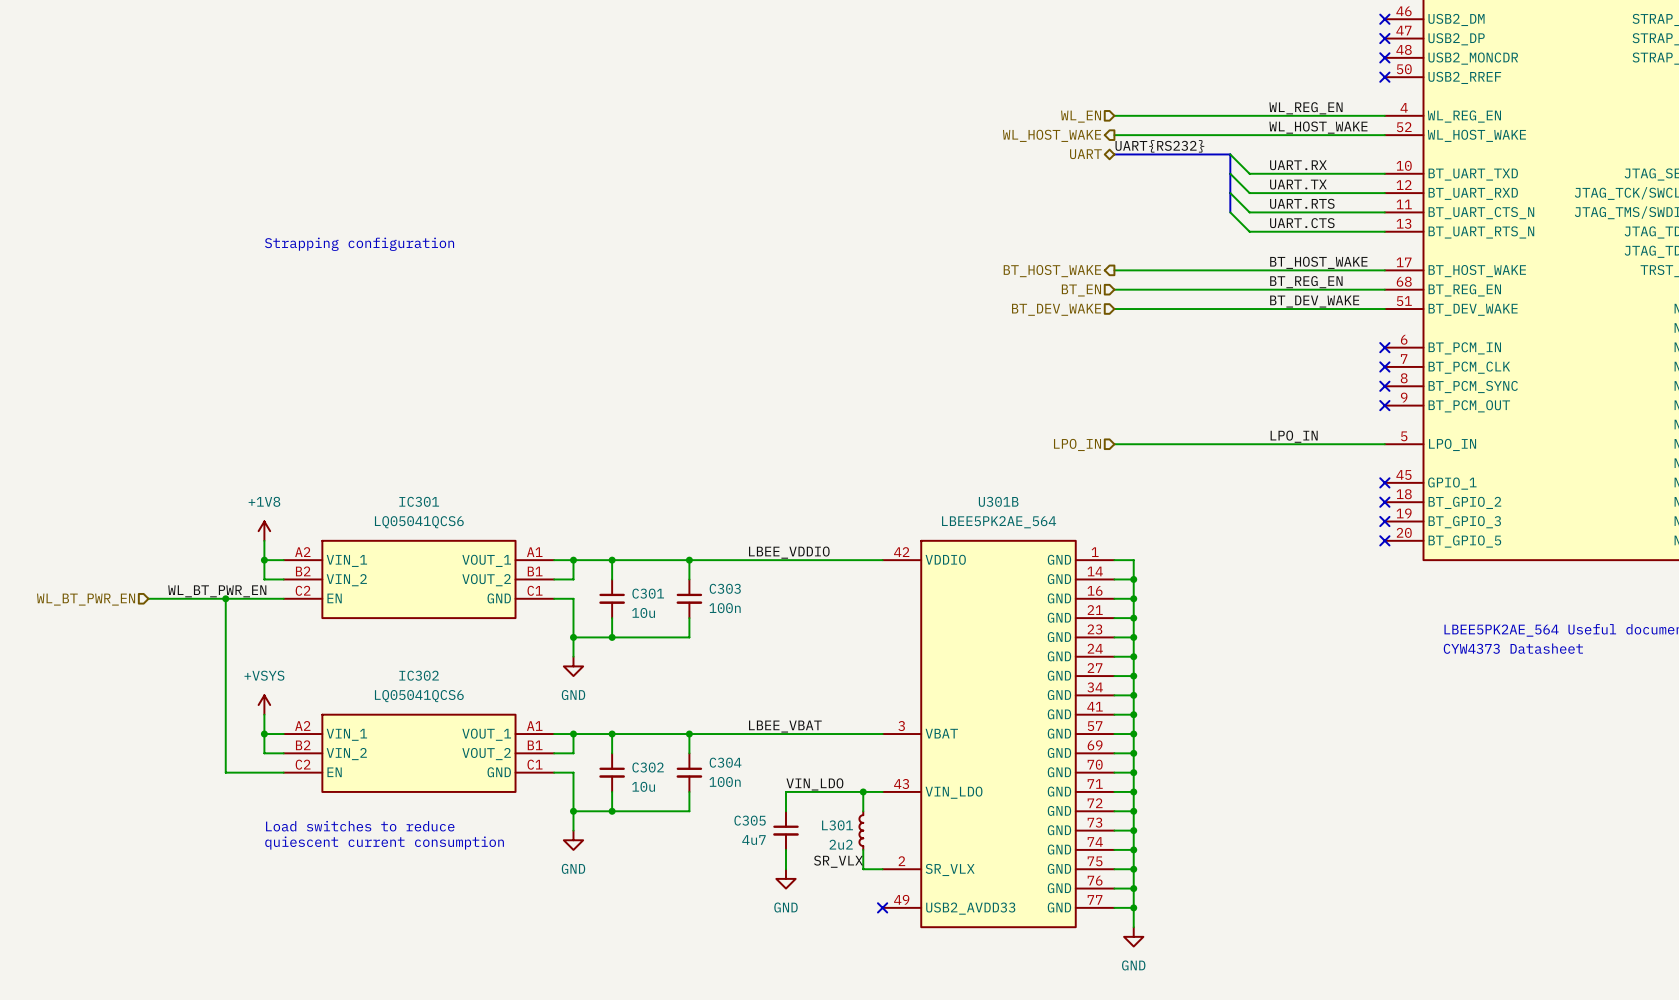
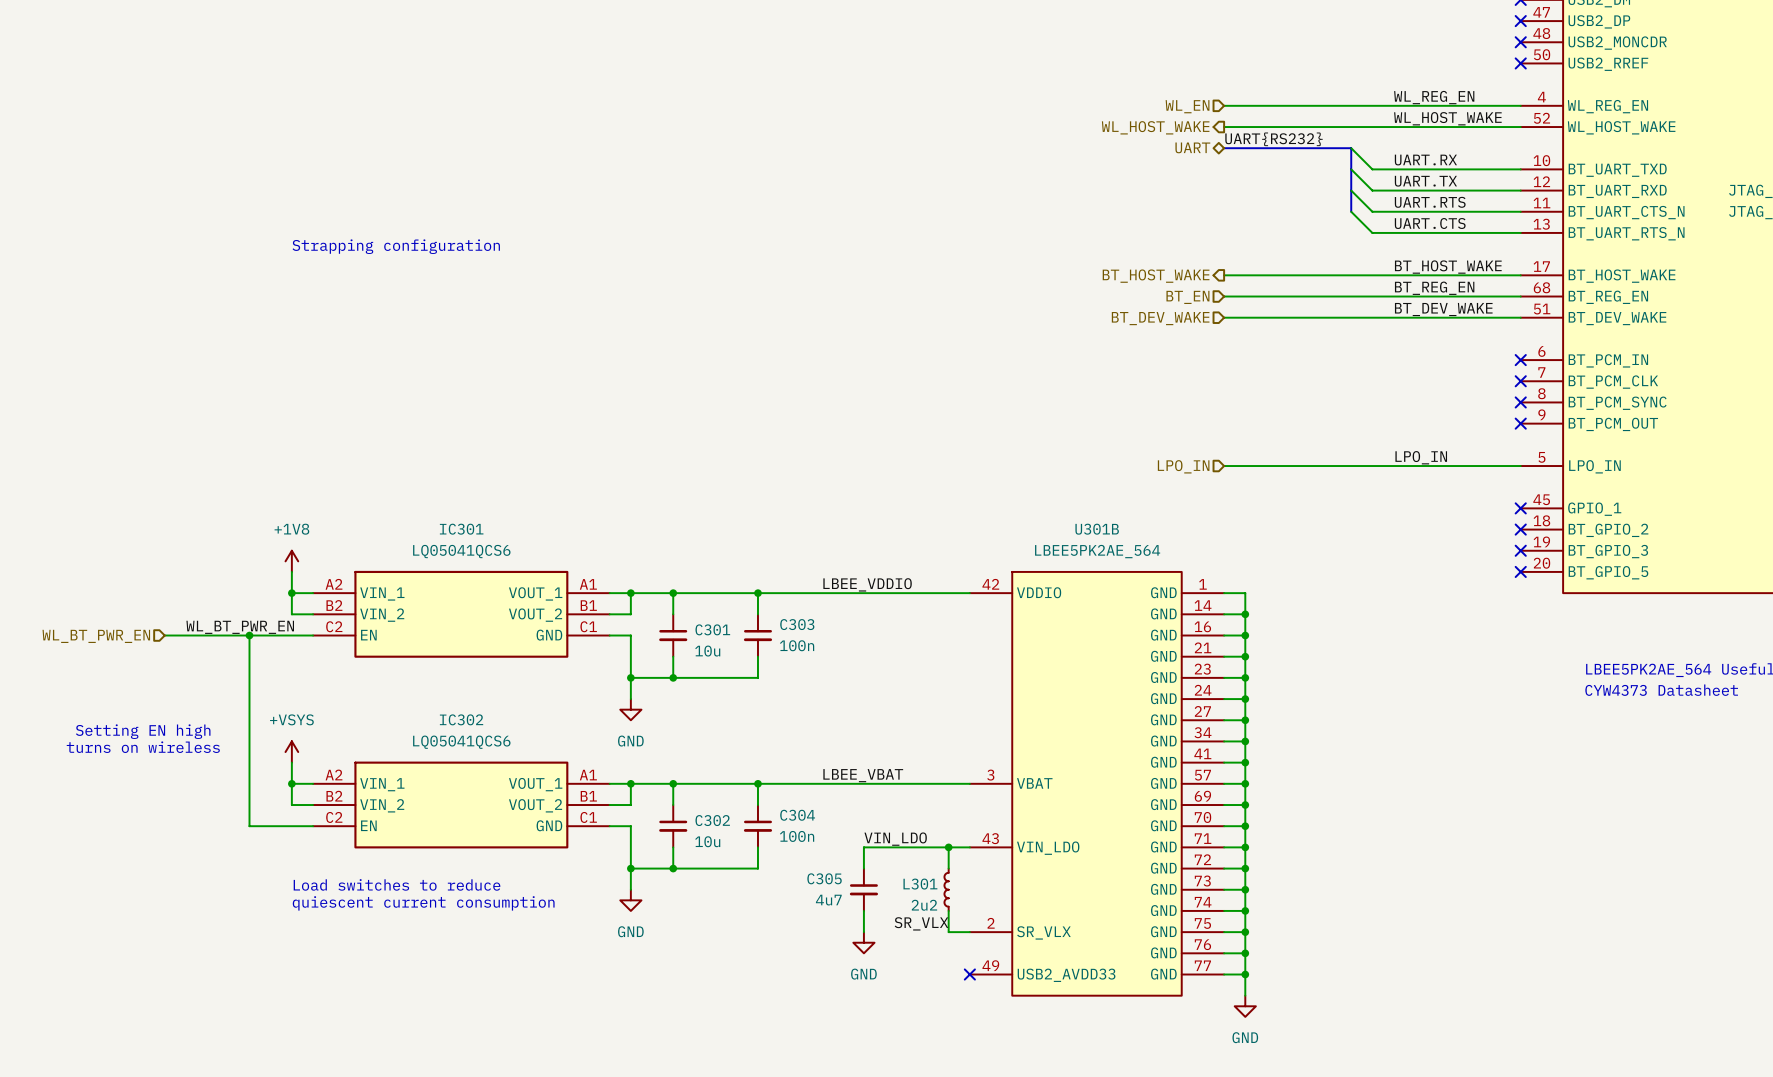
text: none -> Setting EN high (143, 731)
text: none -> turns on wireless (143, 747)

